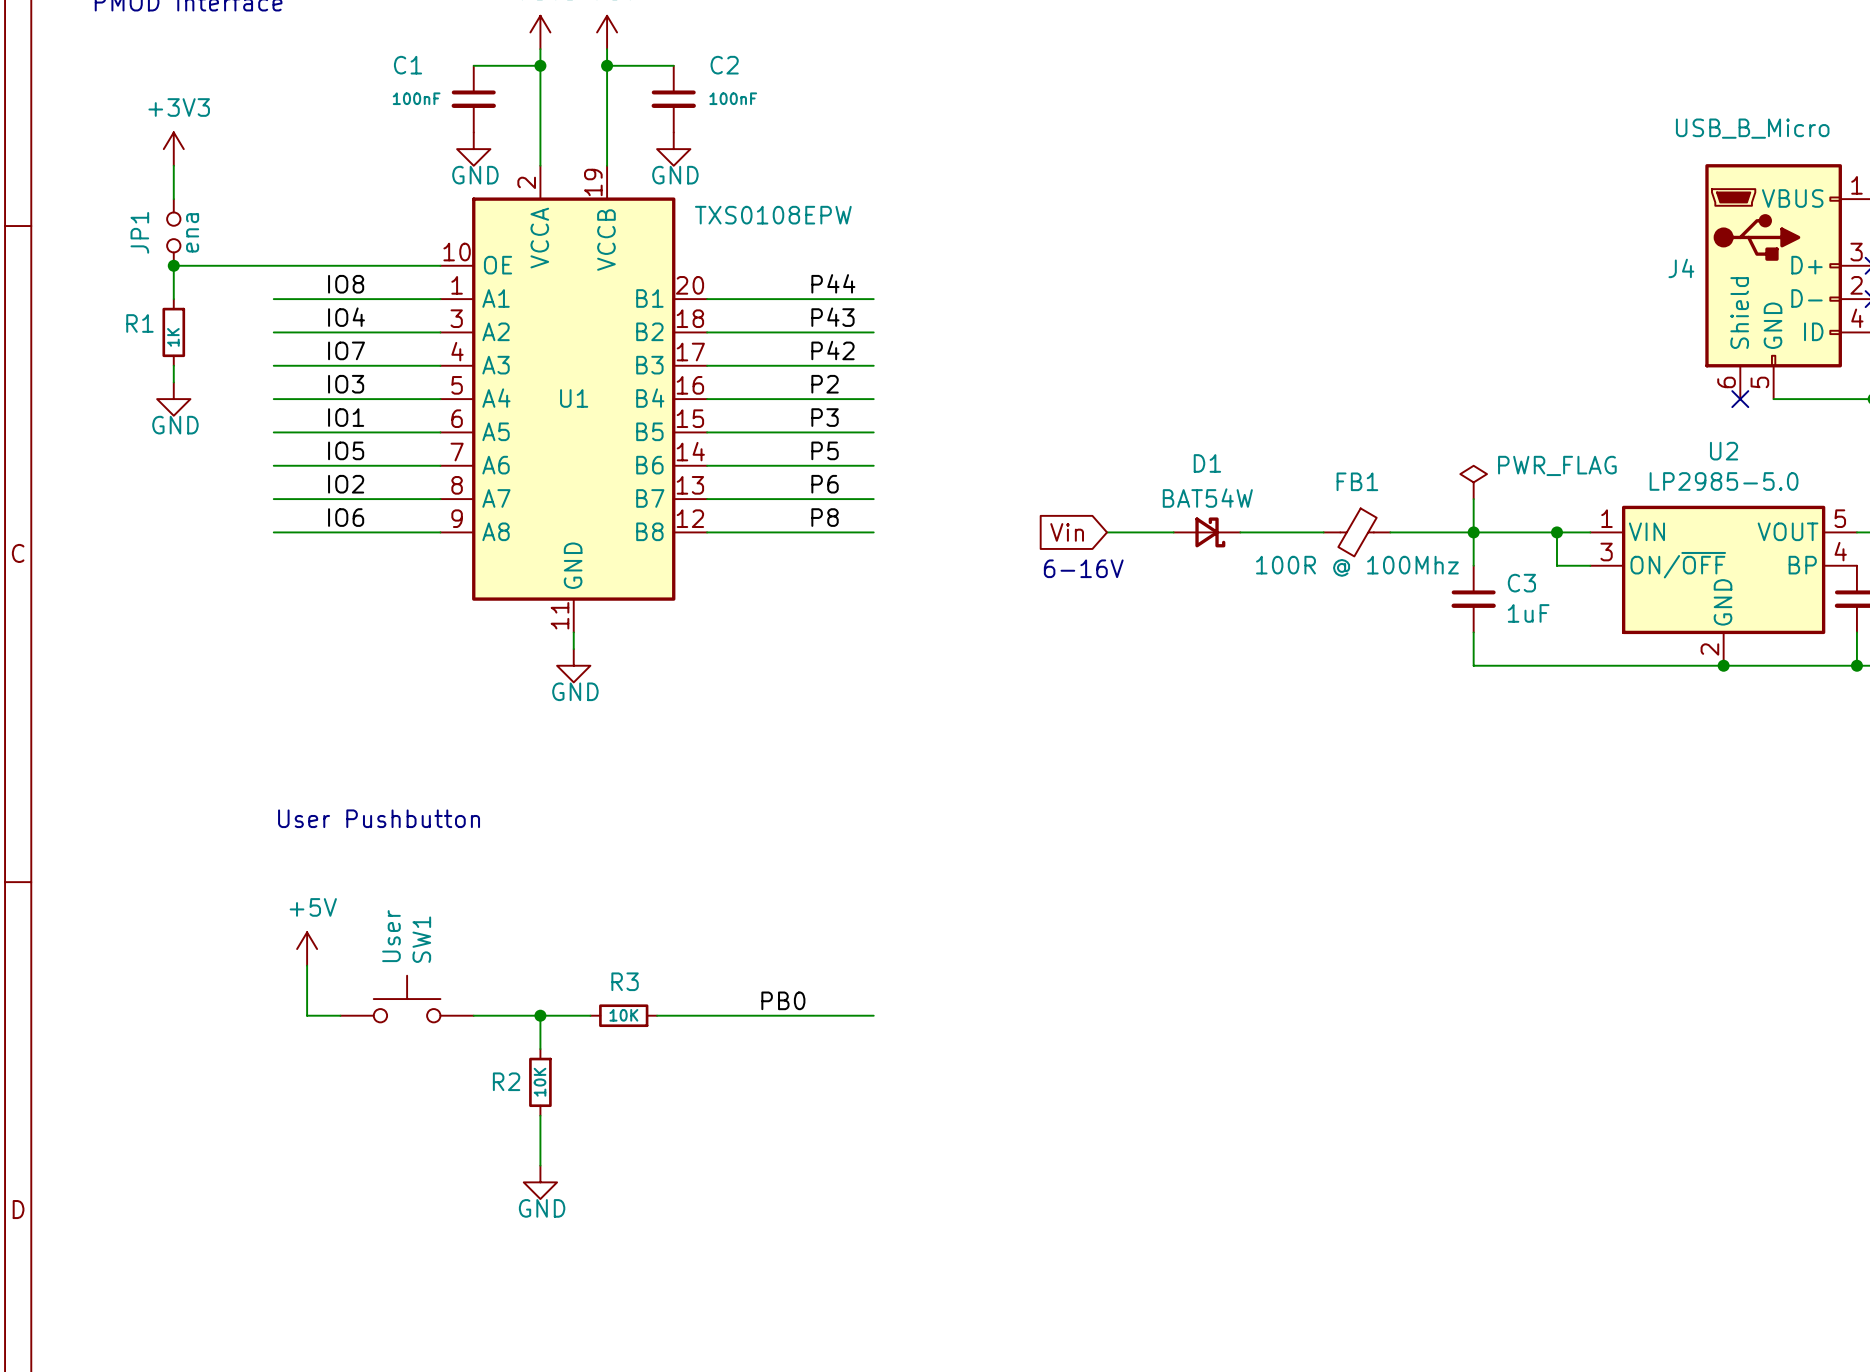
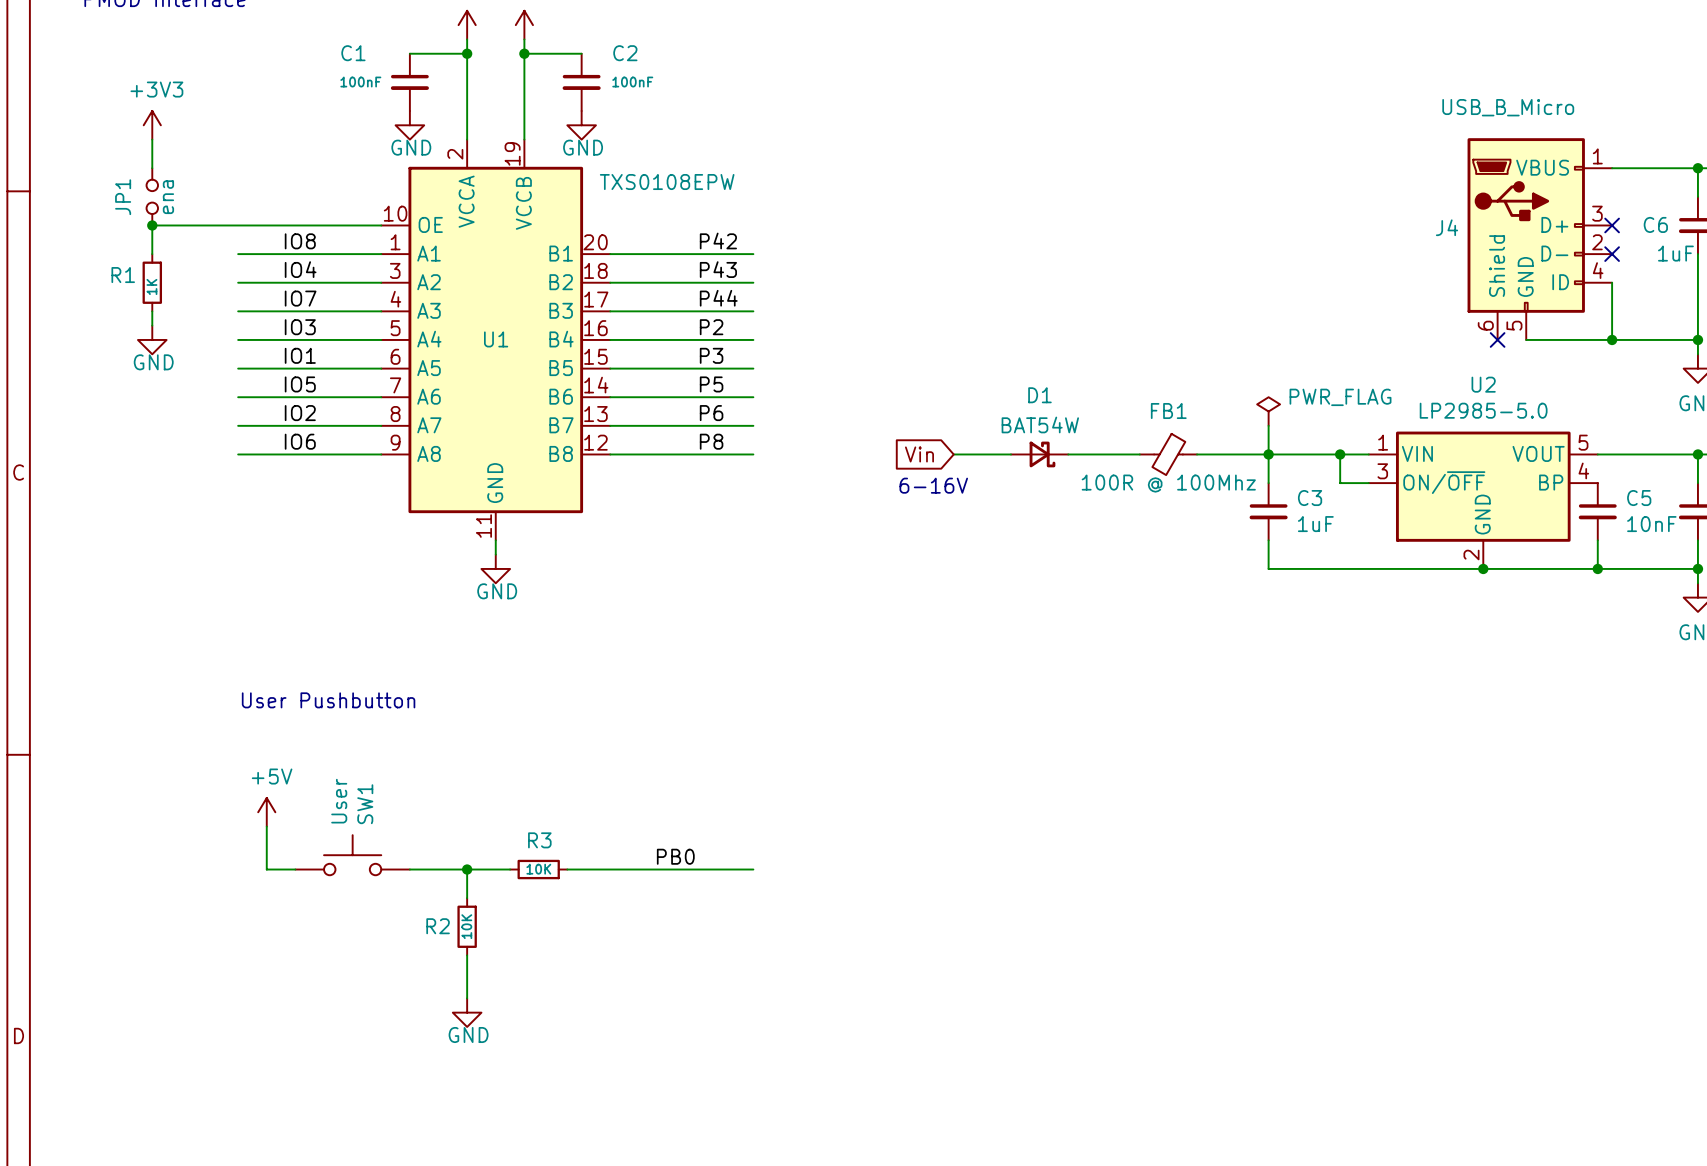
label: P44 (833, 283) -> P42 (718, 240)
label: P42 (832, 350) -> P44 (718, 298)

